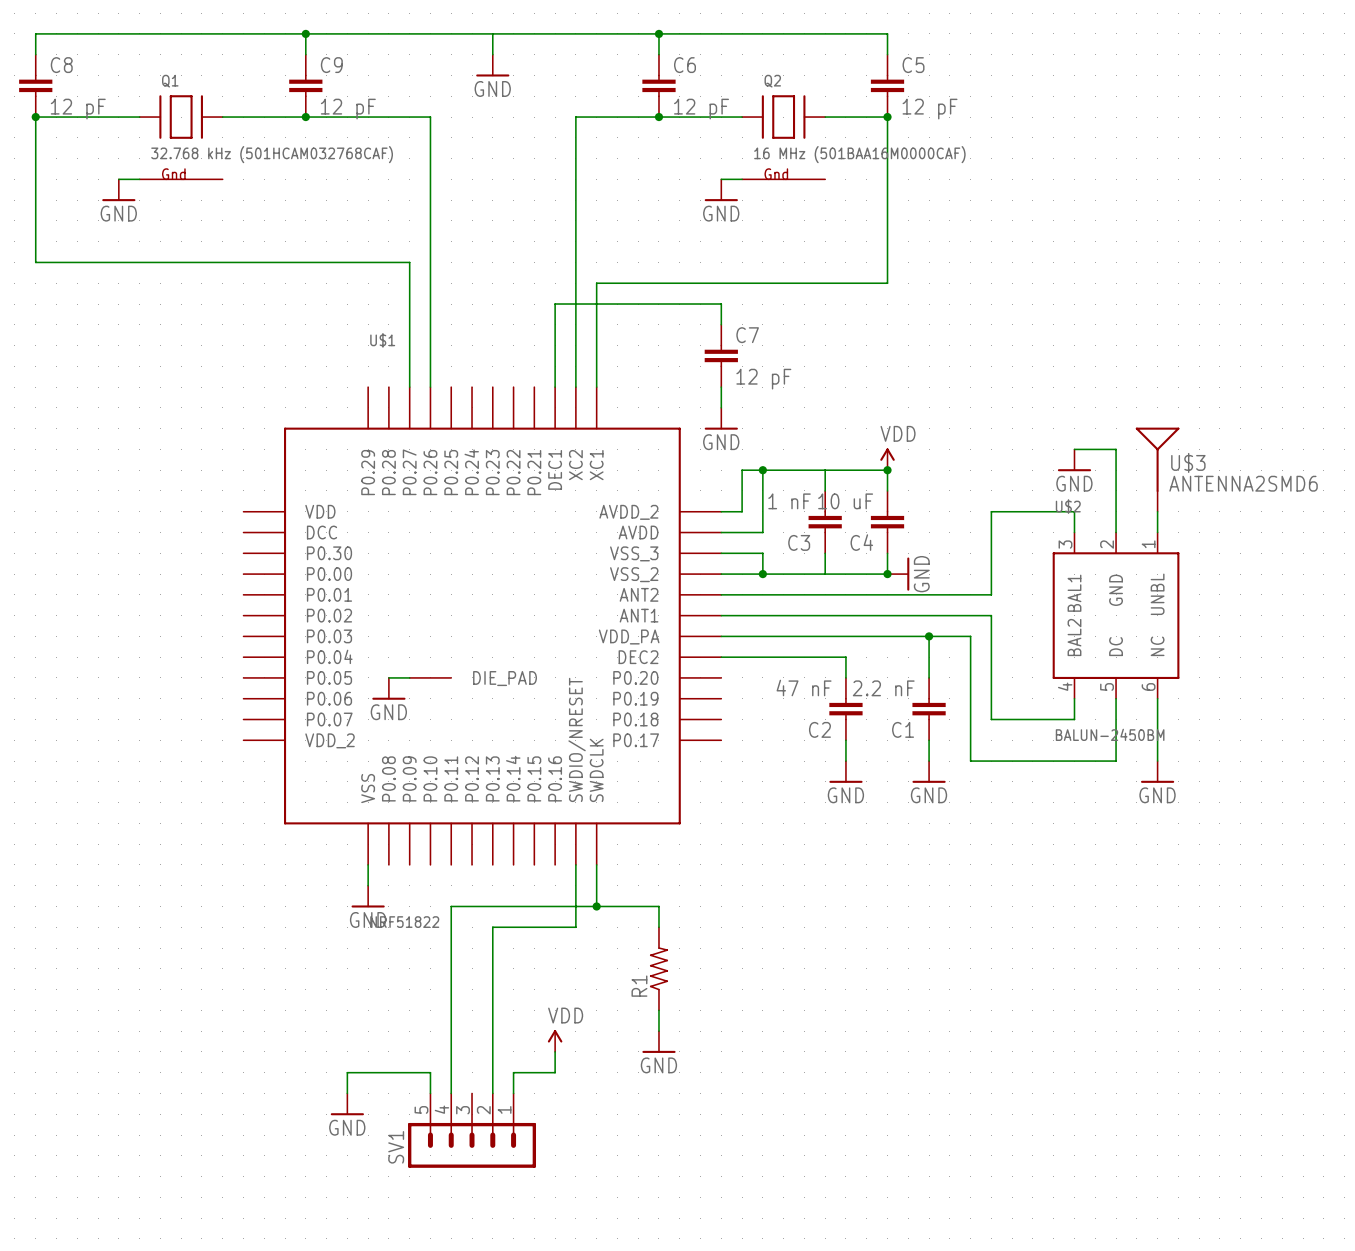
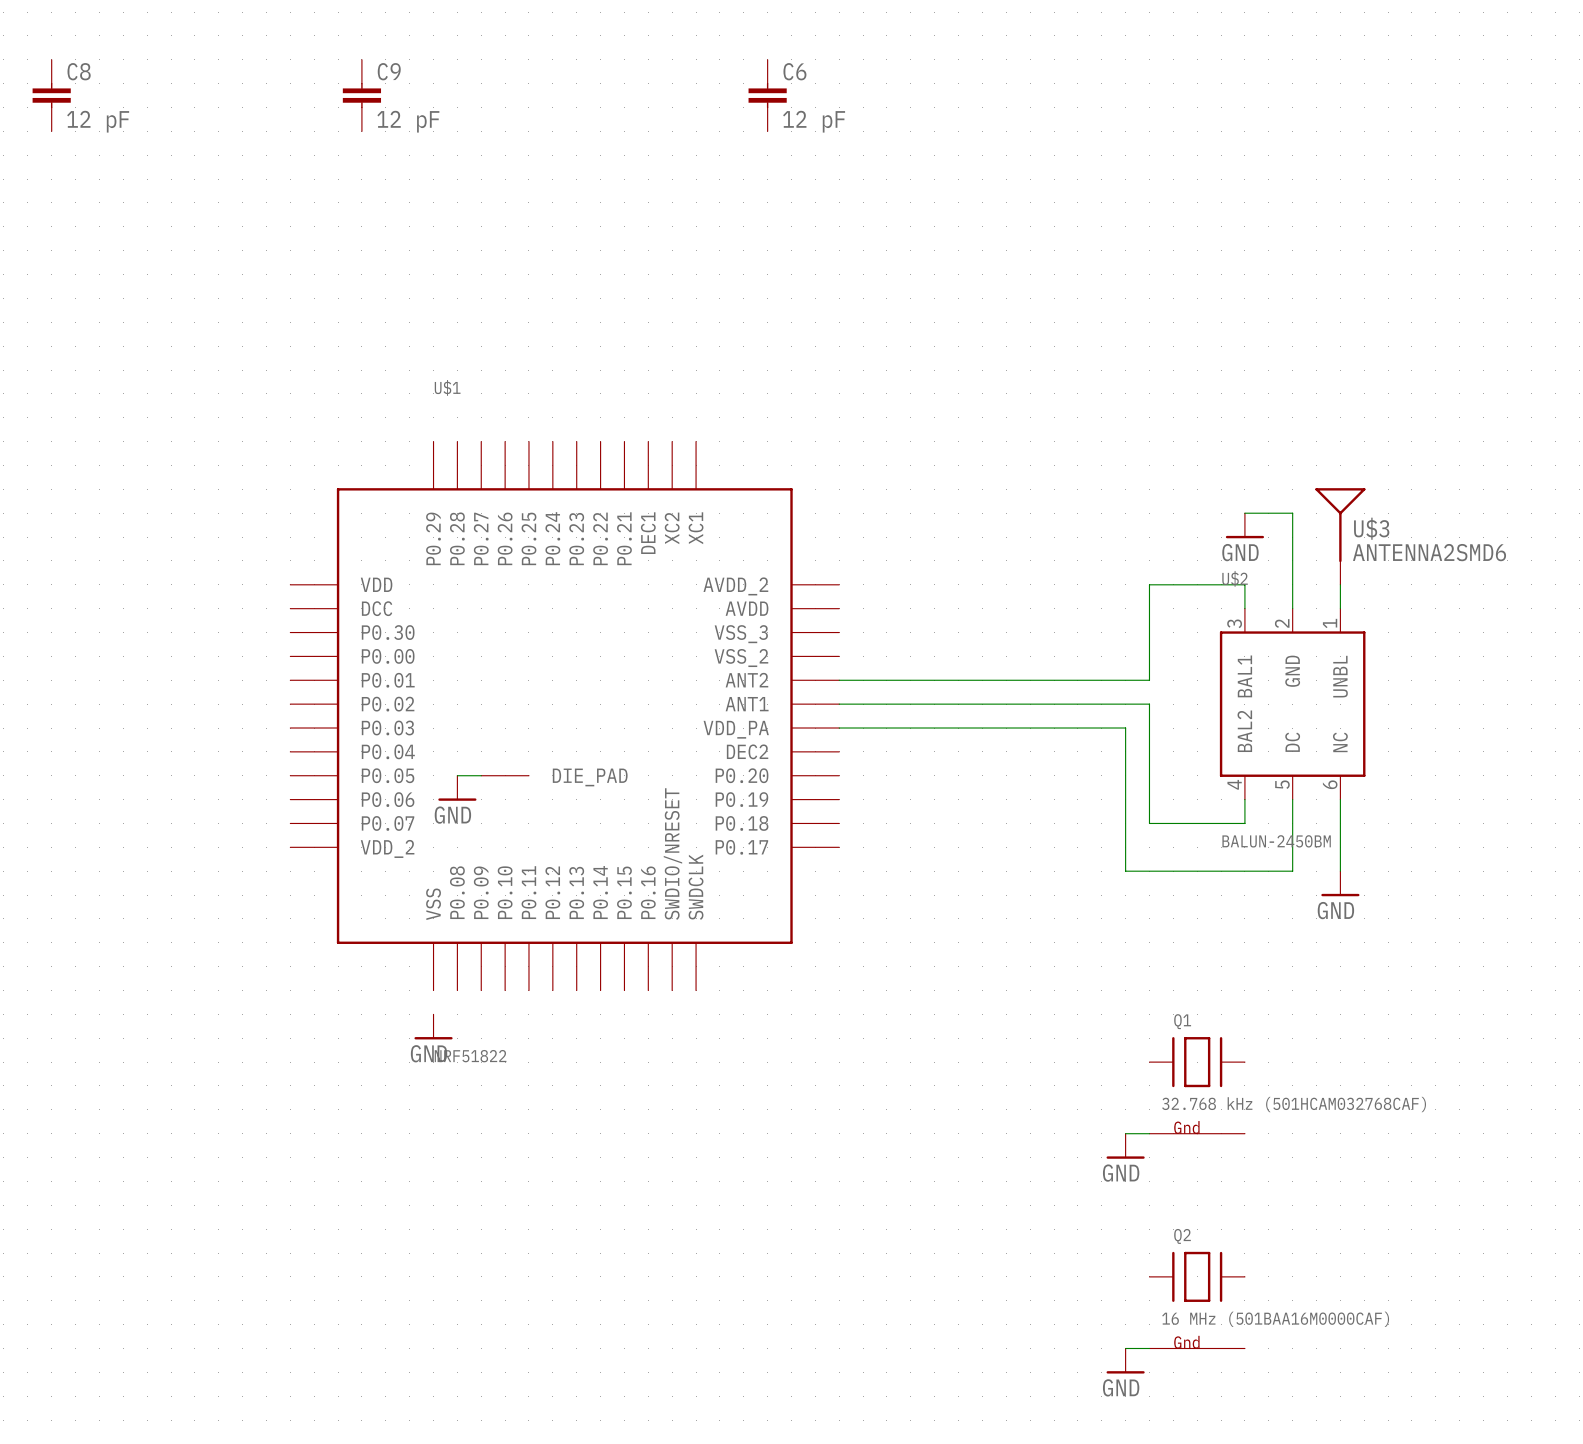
wire: (305, 33) (305, 54) -> none
junction: (305, 33) -> none
wire: (492, 33) (492, 54) -> none
wire: (658, 33) (658, 54) -> none
junction: (658, 33) -> none
wire: (35, 54) (35, 33) (887, 33) (887, 54) -> none
power symbol: GND (492, 65) -> none
C5: 12 pF (887, 85) -> none
junction: (35, 117) -> none
wire: (139, 117) (35, 117) (35, 262) (409, 262) (409, 387) -> none
wire: (222, 117) (430, 117) (430, 387) -> none
junction: (305, 117) -> none
junction: (658, 117) -> none
wire: (742, 117) (575, 117) (575, 387) -> none
wire: (825, 117) (887, 117) (887, 283) (596, 283) (596, 387) -> none
junction: (887, 117) -> none
Q1 position: (181, 137) -> (1197, 1085)
Q2 position: (783, 137) -> (1197, 1300)
wire: (118, 179) (139, 179) -> none
wire: (721, 179) (742, 179) -> none
power symbol: GND (118, 190) -> none
power symbol: GND (721, 190) -> none
wire: (721, 324) (721, 304) (555, 304) (555, 387) -> none
C7: 12 pF (721, 355) -> none
wire: (721, 387) (721, 407) -> none
power symbol: GND (721, 418) -> none
power symbol: VDD (887, 459) -> none
wire: (762, 470) (762, 532) (721, 532) -> none
junction: (762, 470) -> none
wire: (825, 470) (825, 490) -> none
junction: (887, 470) -> none
wire: (887, 490) (887, 470) (742, 470) (742, 511) (721, 511) -> none
C3: 1 nF (825, 522) -> none
C4: 10 uF (887, 522) -> none
wire: (721, 553) (762, 553) (762, 574) -> none
wire: (825, 553) (825, 574) -> none
wire: (887, 553) (887, 574) (721, 574) -> none
junction: (762, 574) -> none
junction: (887, 574) -> none
power symbol: GND (898, 574) -> none
wire: (929, 636) (929, 677) -> none
junction: (929, 636) -> none
wire: (721, 657) (845, 657) (845, 677) -> none
C2: 47 nF (845, 709) -> none
C1: 2.2 nF (929, 709) -> none
wire: (845, 740) (845, 761) -> none
wire: (929, 740) (929, 761) -> none
power symbol: GND (845, 771) -> none
power symbol: GND (929, 771) -> none
wire: (368, 864) (368, 885) -> none
wire: (575, 864) (575, 927) (492, 927) (492, 1093) -> none
wire: (596, 864) (596, 906) -> none
junction: (596, 906) -> none
wire: (658, 927) (658, 906) (451, 906) (451, 1093) -> none
R1: (658, 968) -> none
wire: none -> (1125, 1133) (1149, 1133)
power symbol: none -> GND (1125, 1146)
wire: (658, 1010) (658, 1031) -> none
power symbol: VDD (555, 1041) -> none
power symbol: GND (658, 1042) -> none
wire: (555, 1051) (555, 1072) (513, 1072) (513, 1093) -> none
wire: (347, 1093) (347, 1072) (430, 1072) (430, 1093) -> none
power symbol: GND (347, 1104) -> none
SV1: (472, 1130) -> none
wire: none -> (1125, 1348) (1149, 1348)
power symbol: none -> GND (1125, 1361)

